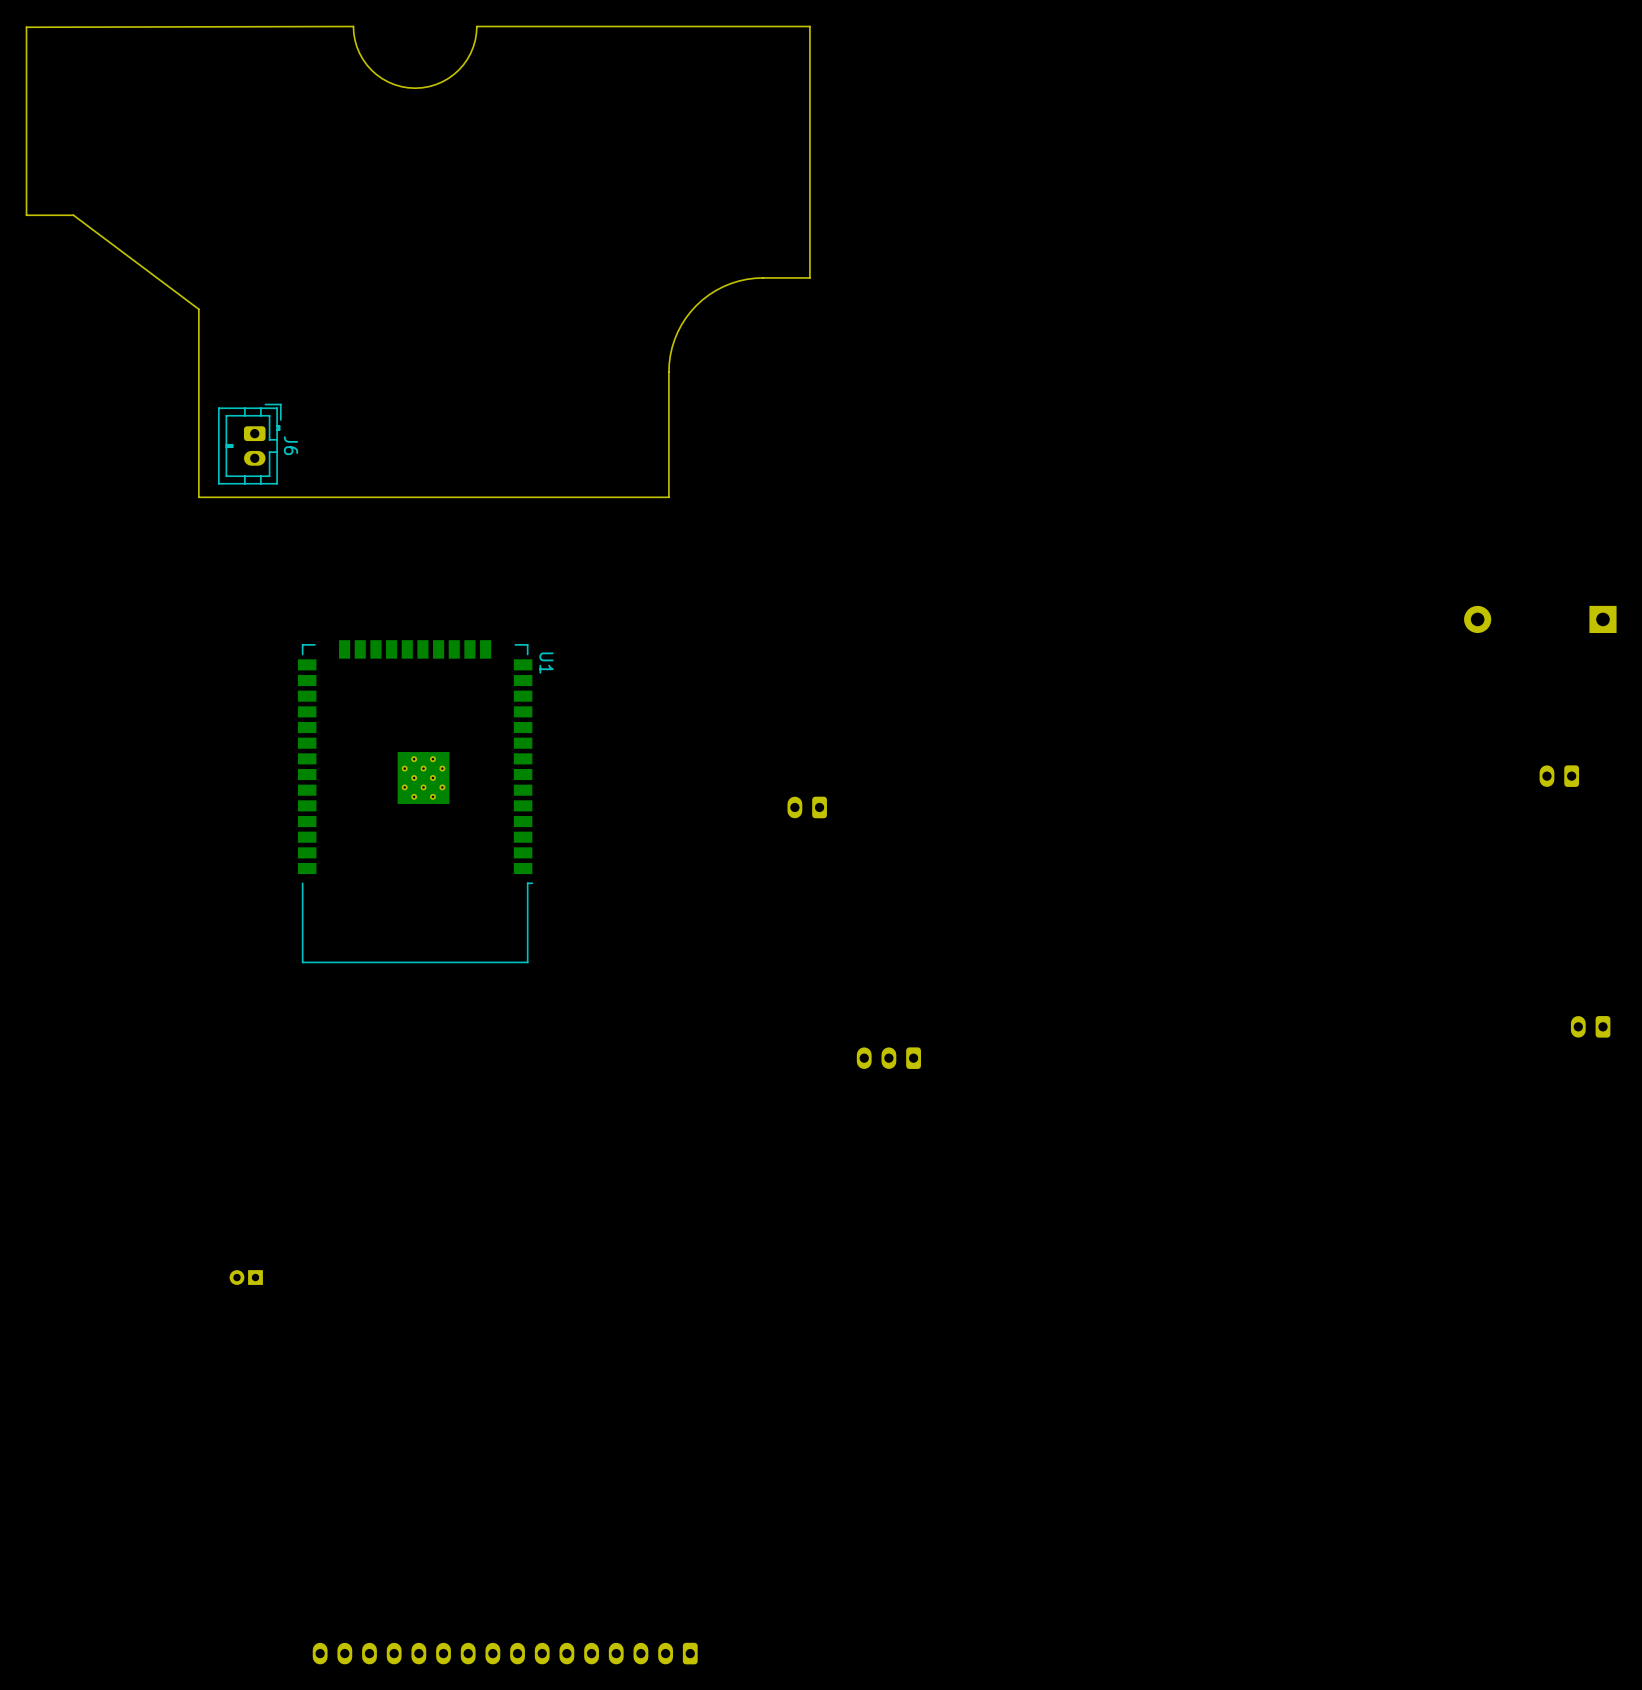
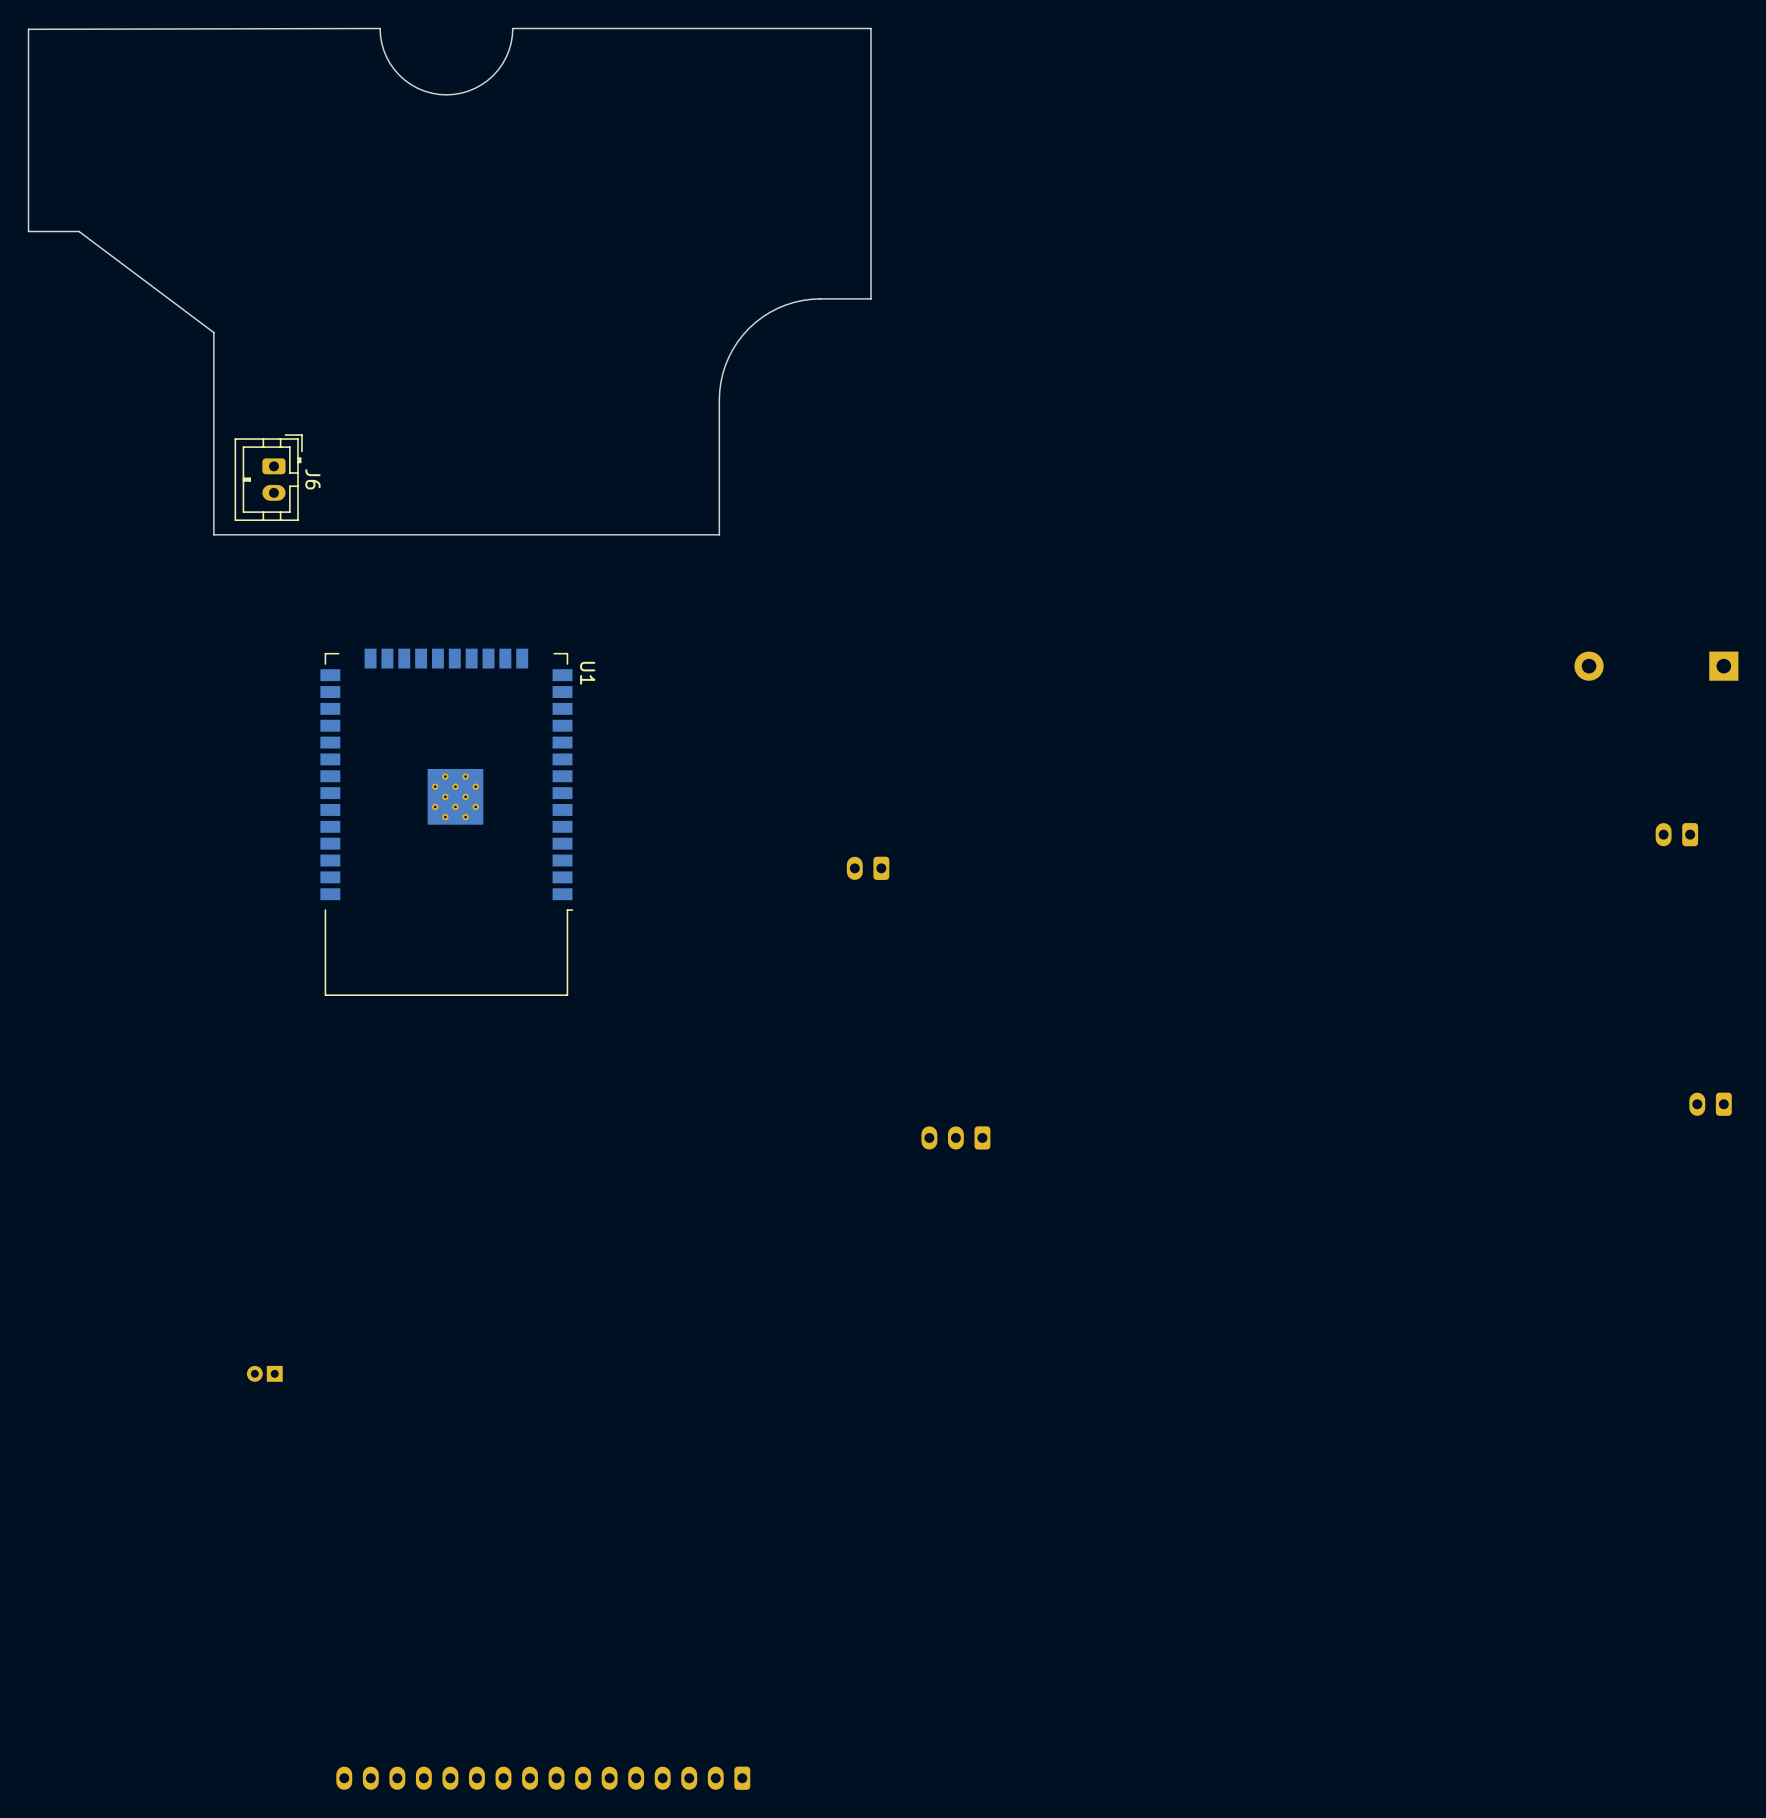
U1 position: (415, 801) -> (446, 822)

